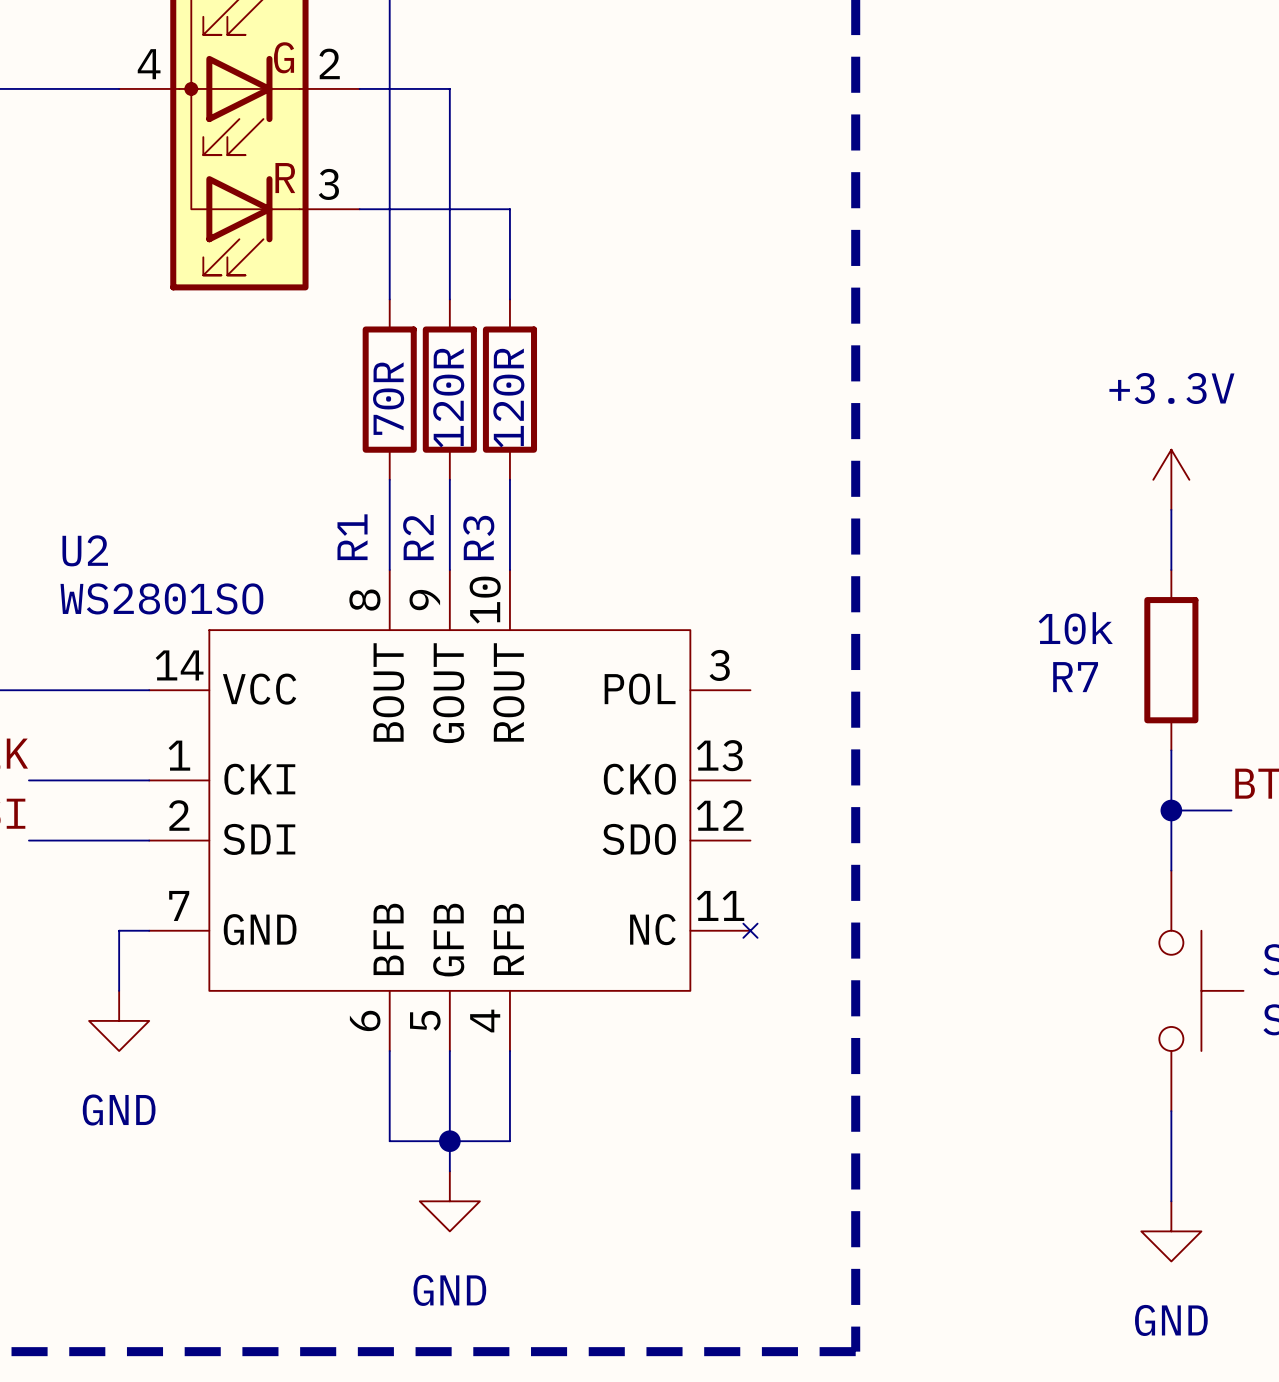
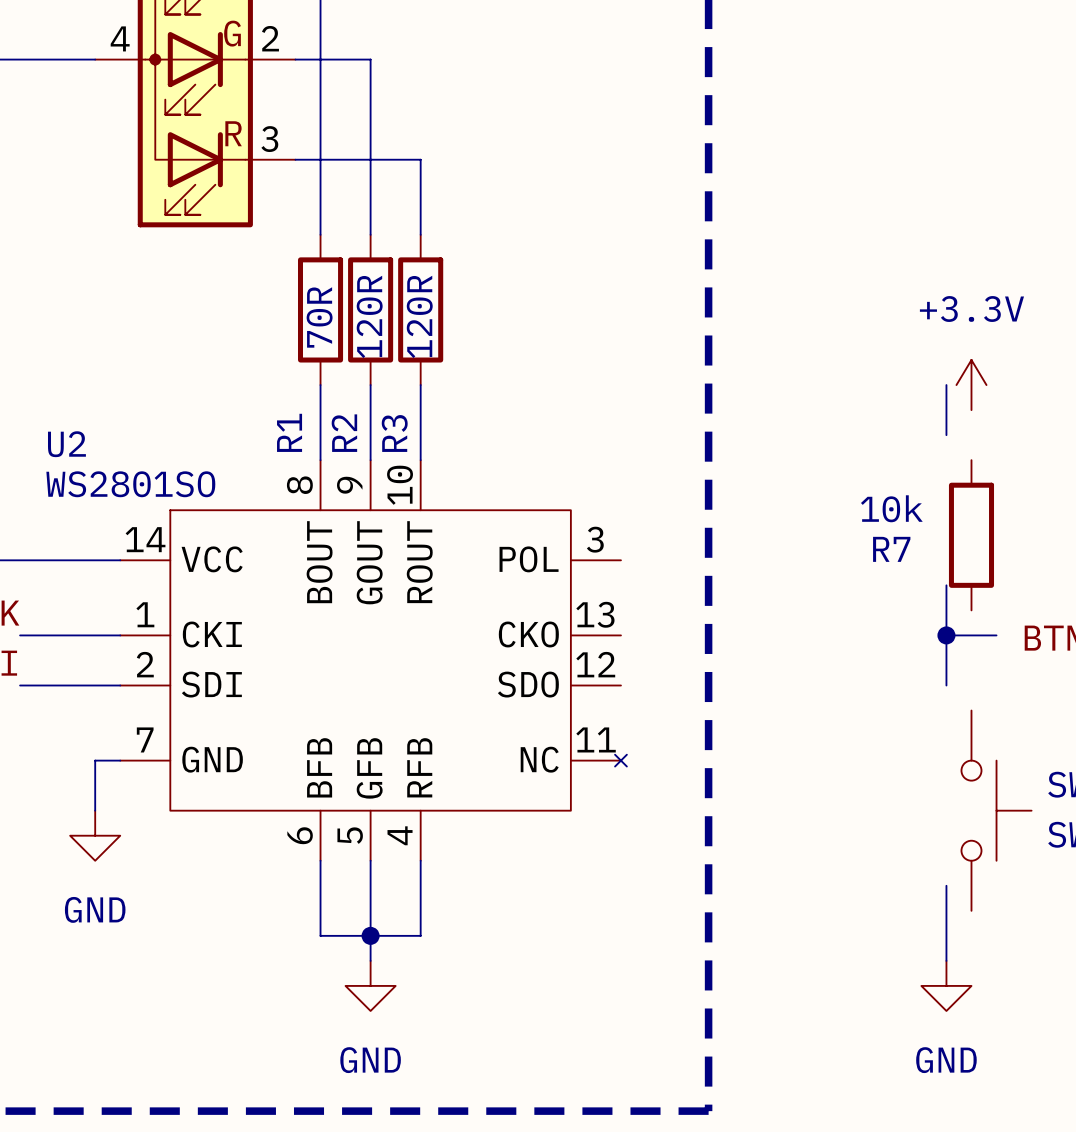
wire: (1171, 509) (1171, 569) -> (946, 385) (946, 435)
wire: (1171, 750) (1171, 870) -> (946, 585) (946, 685)
wire: (1171, 810) (1231, 810) -> (946, 635) (996, 635)
junction position: (1171, 810) -> (946, 635)
wire: (1171, 1111) (1171, 1201) -> (946, 885) (946, 960)
power symbol position: GND (1171, 1231) -> GND (946, 985)

